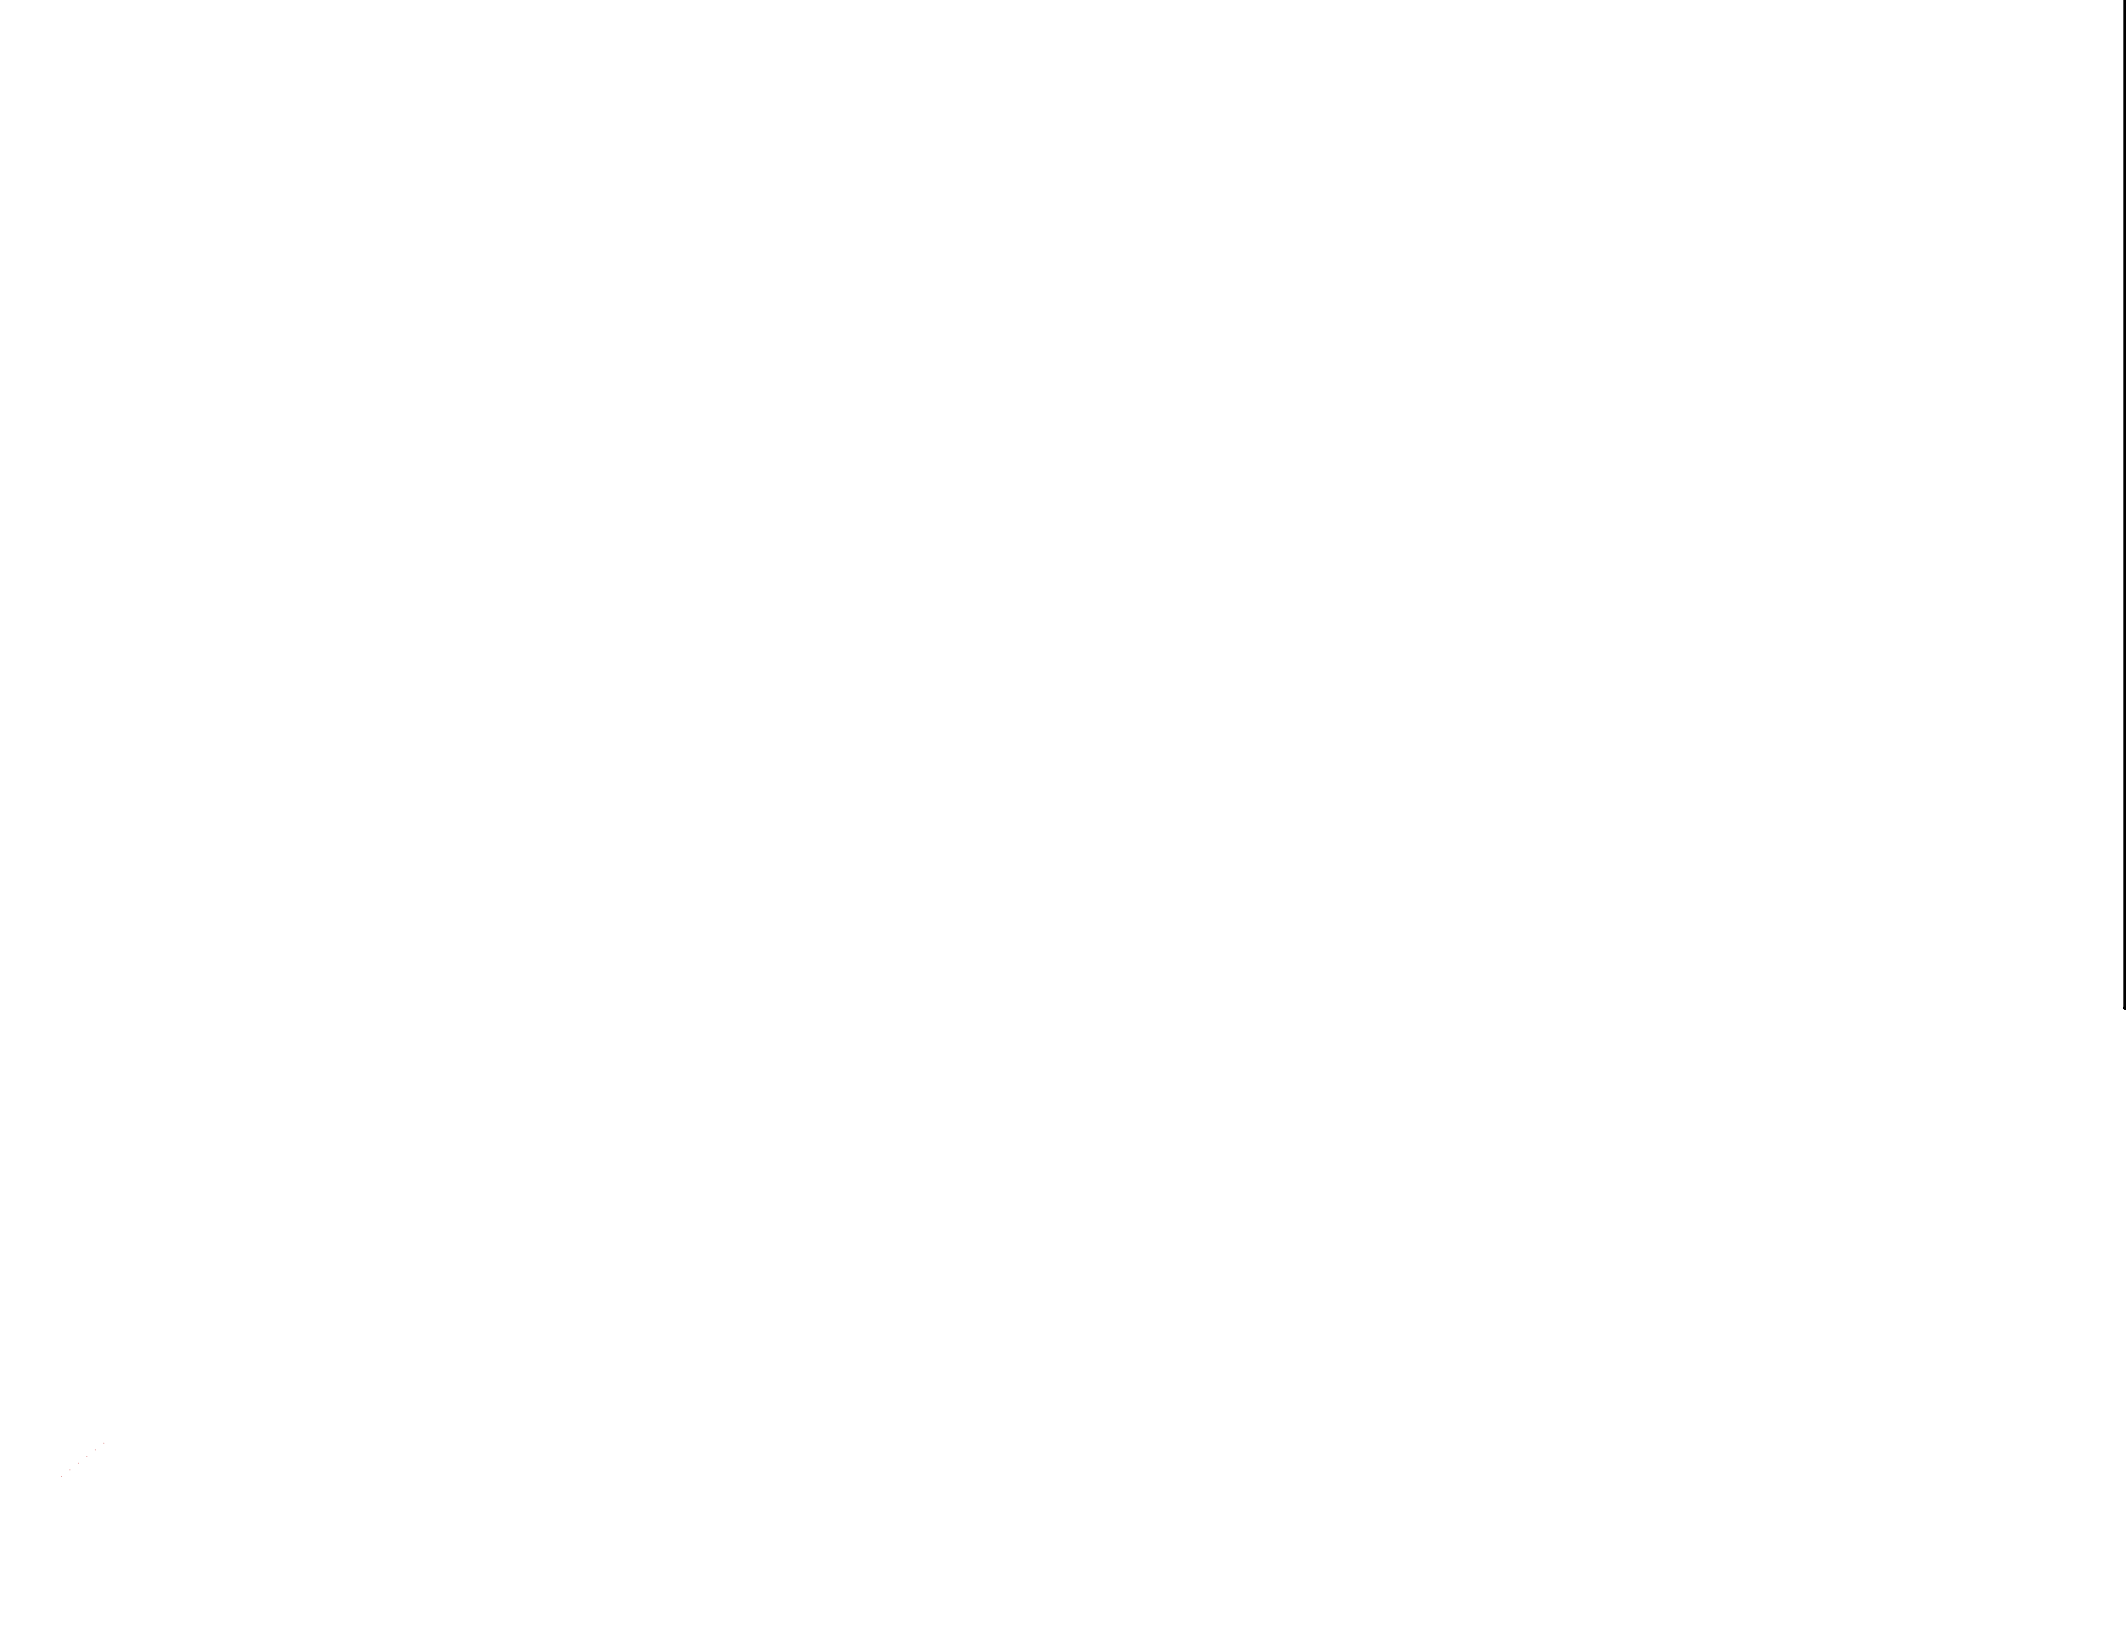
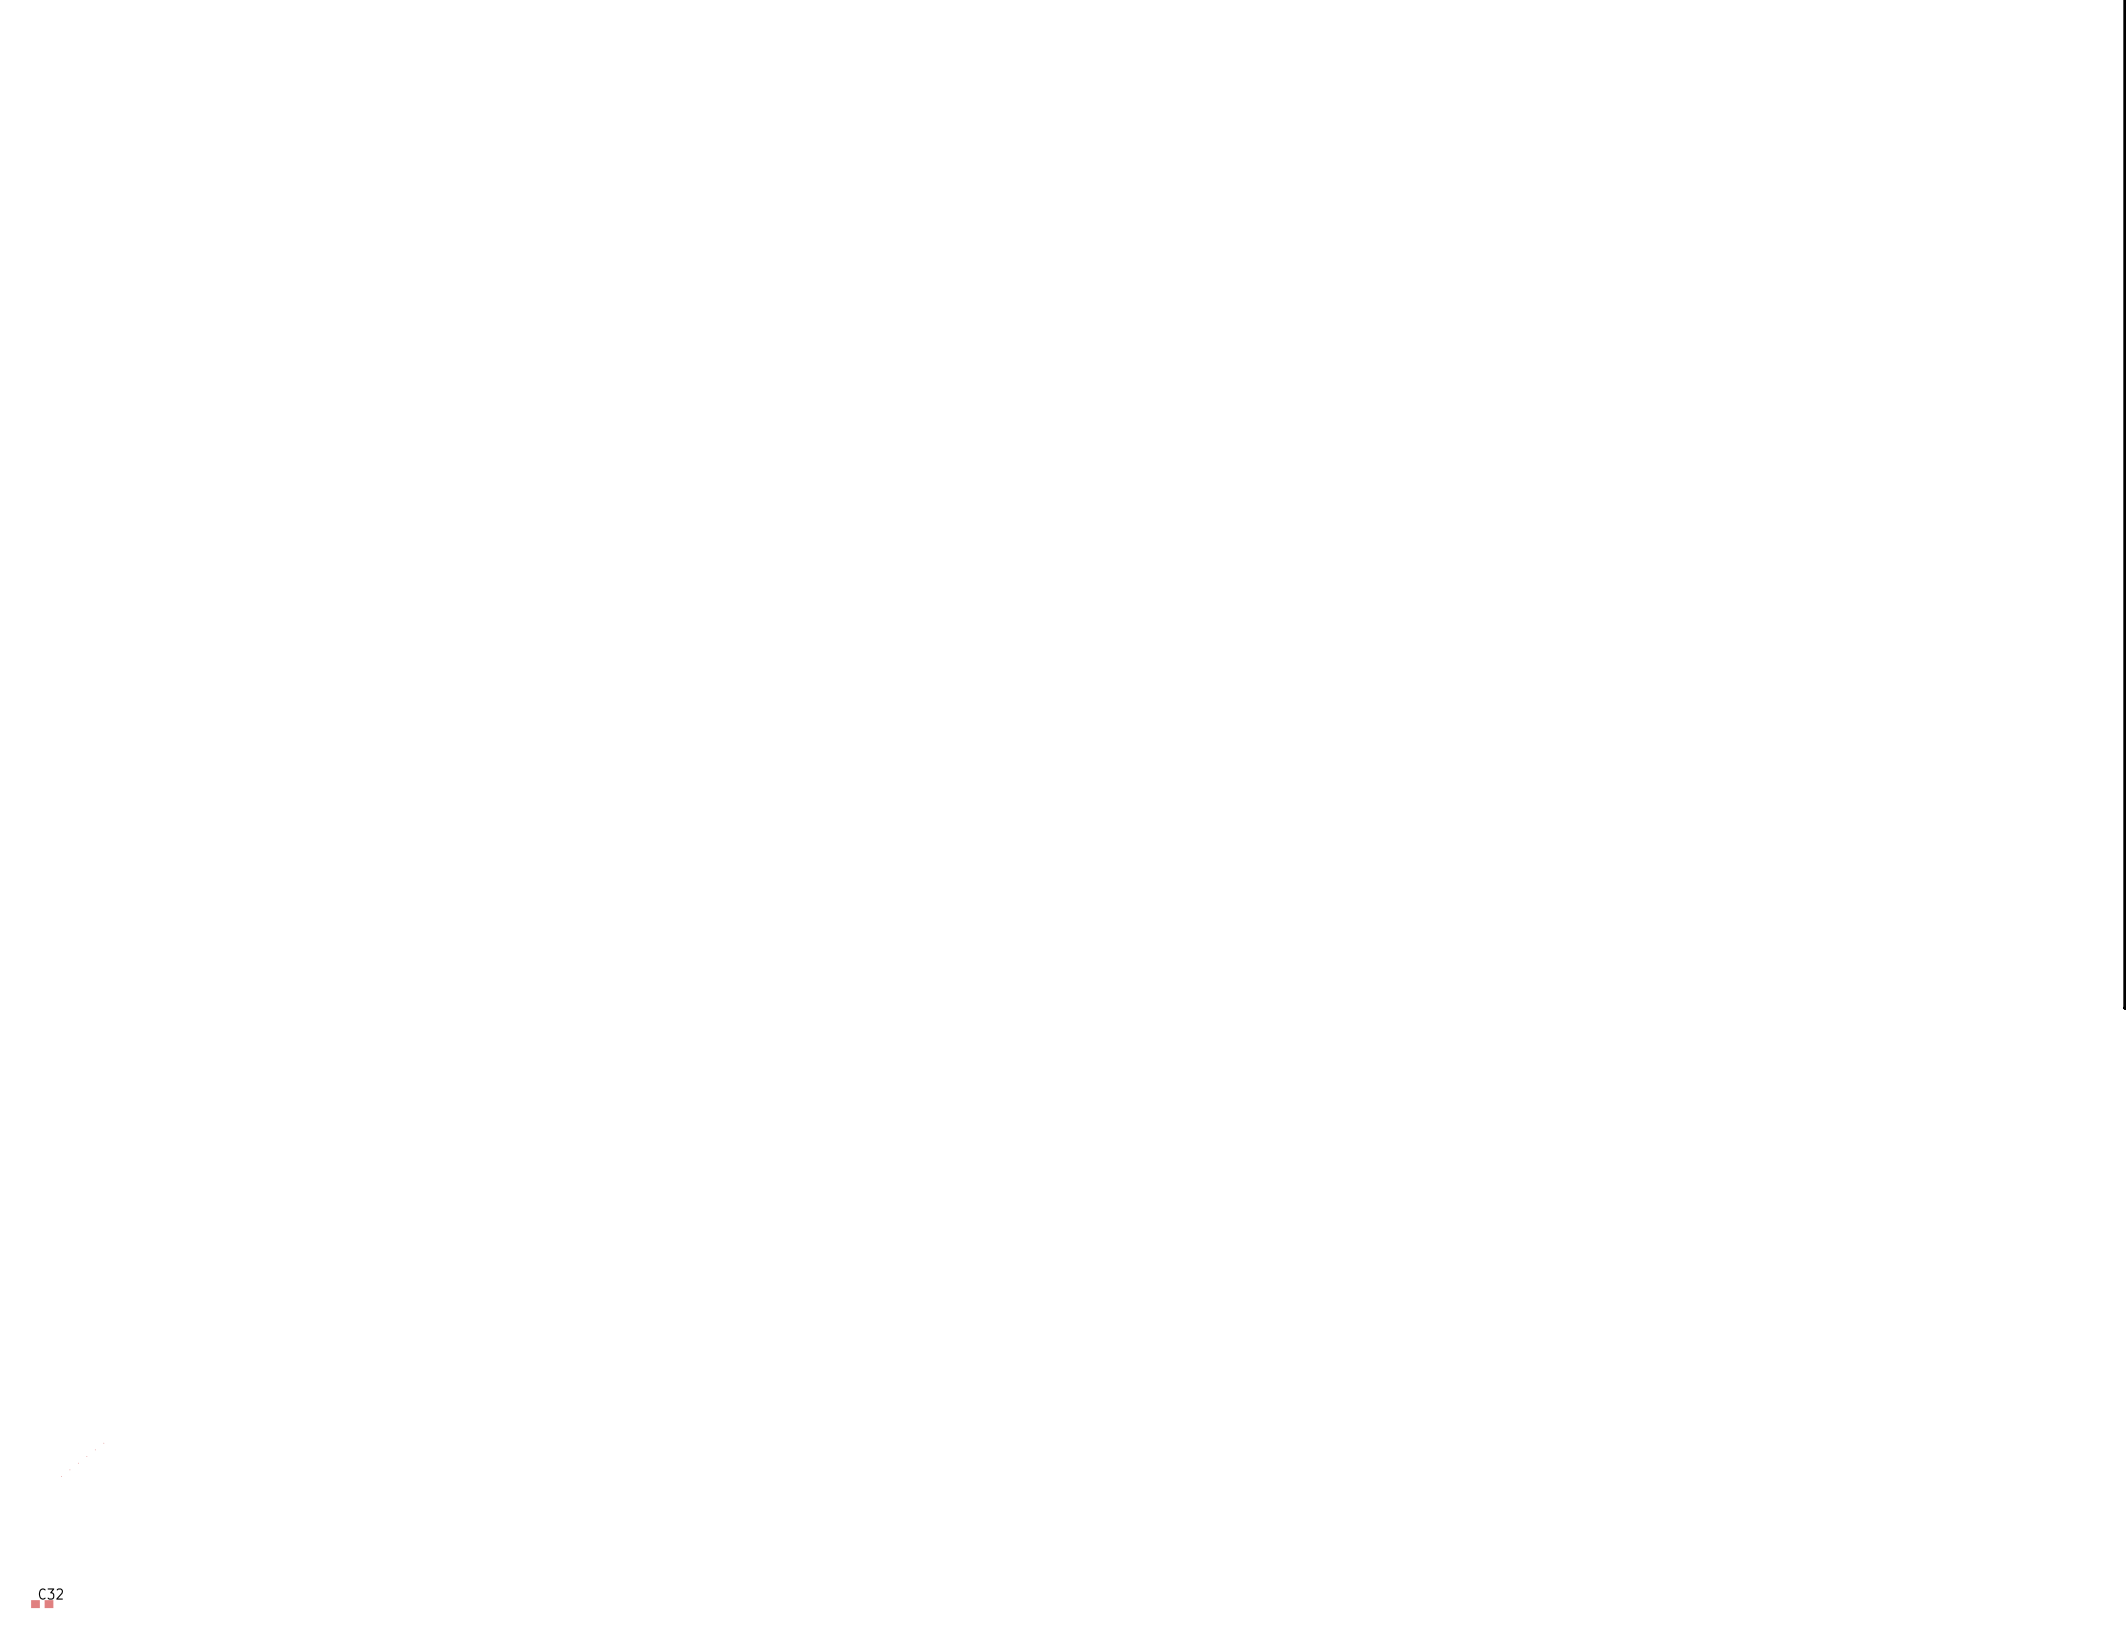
C32: none -> (42, 1604)

